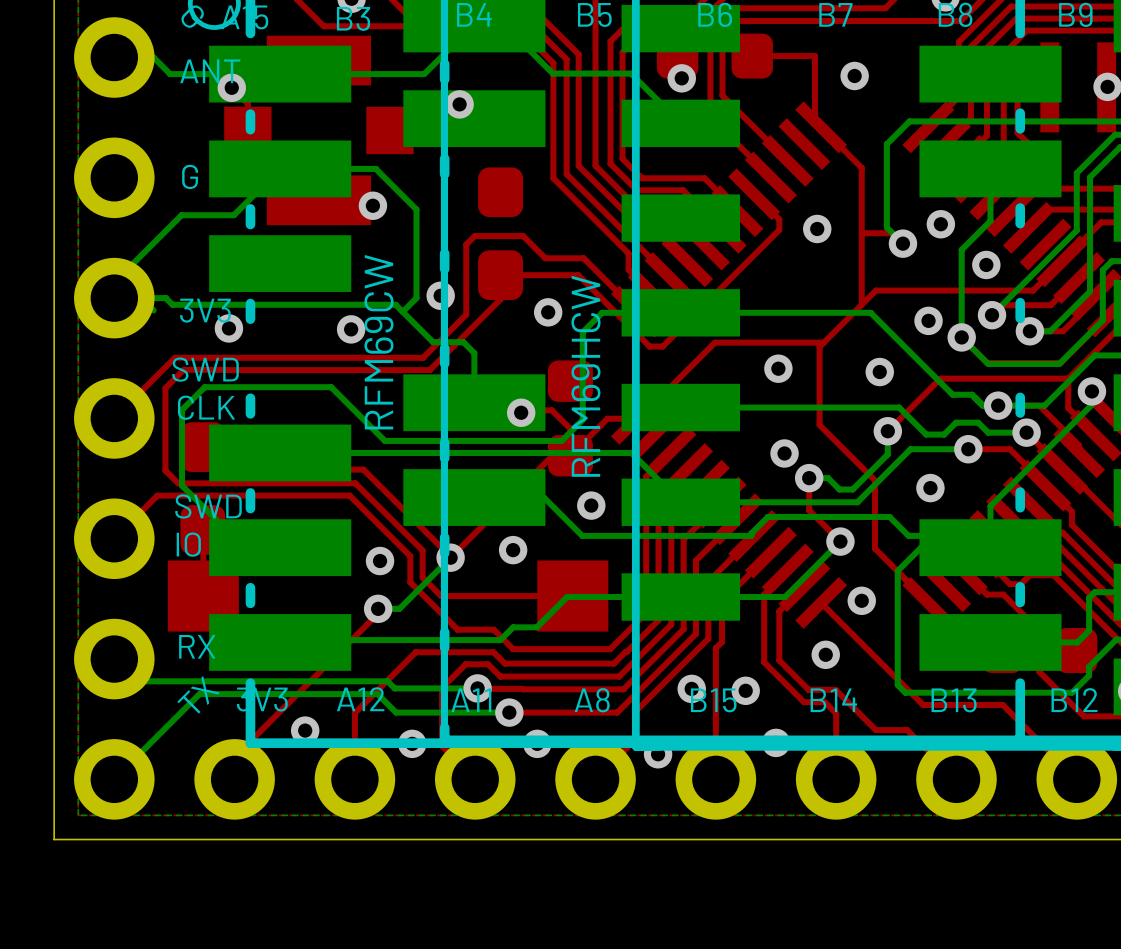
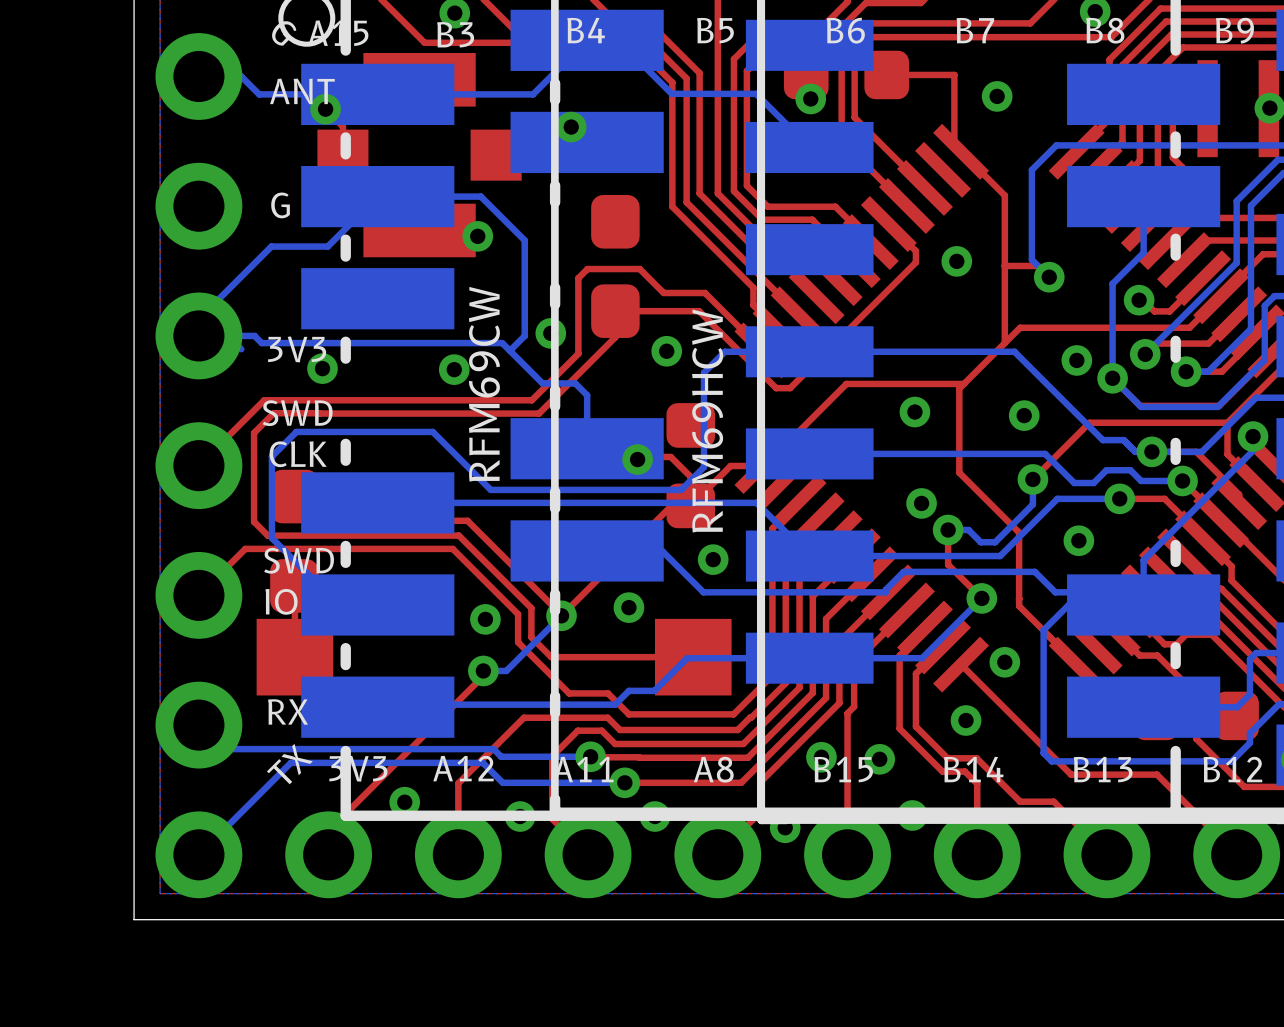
via: (940, 224) -> none
top track: none -> (1203, 278) (1169, 311) (1154, 311) (1143, 300)

